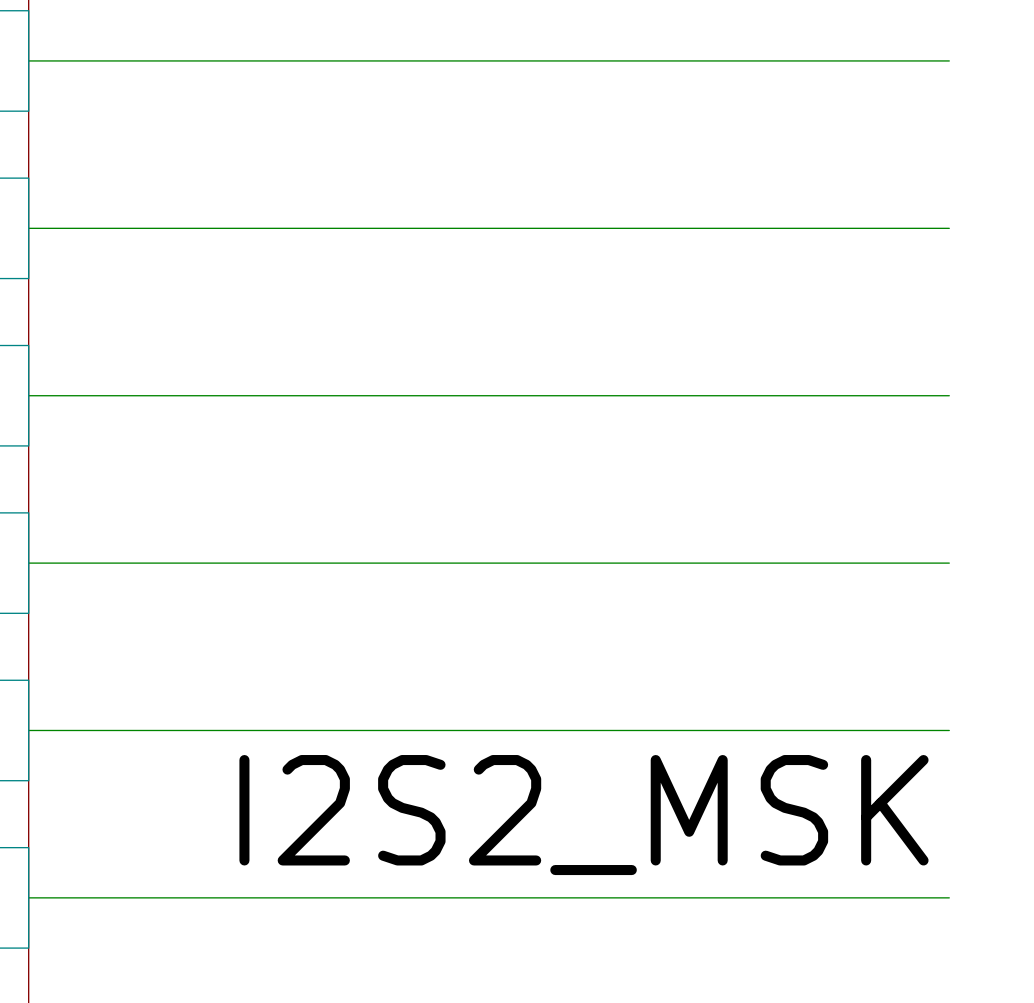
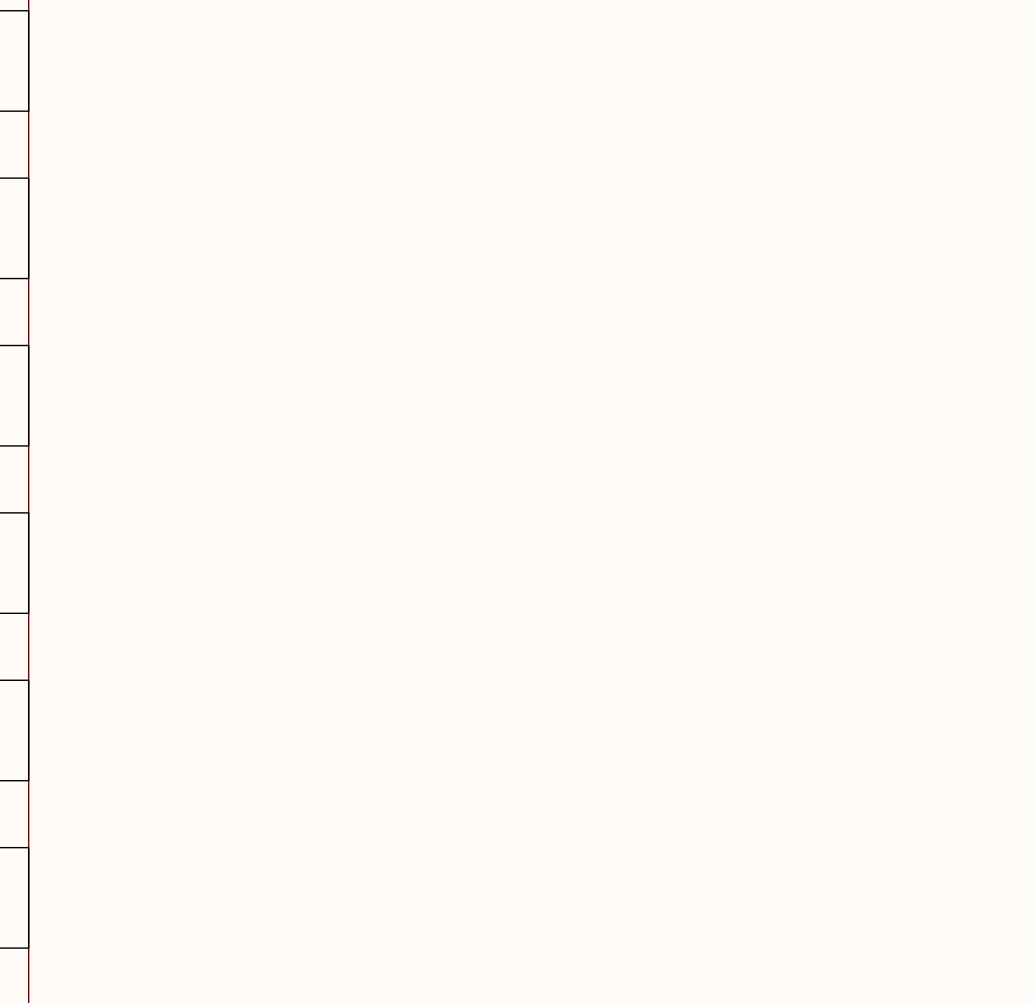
wire: (28, 60) (949, 60) -> none
wire: (28, 228) (949, 228) -> none
wire: (28, 395) (949, 395) -> none
wire: (28, 563) (949, 563) -> none
wire: (28, 730) (949, 730) -> none
label: I2S2_MSK (583, 815) -> none
wire: (28, 897) (949, 897) -> none

